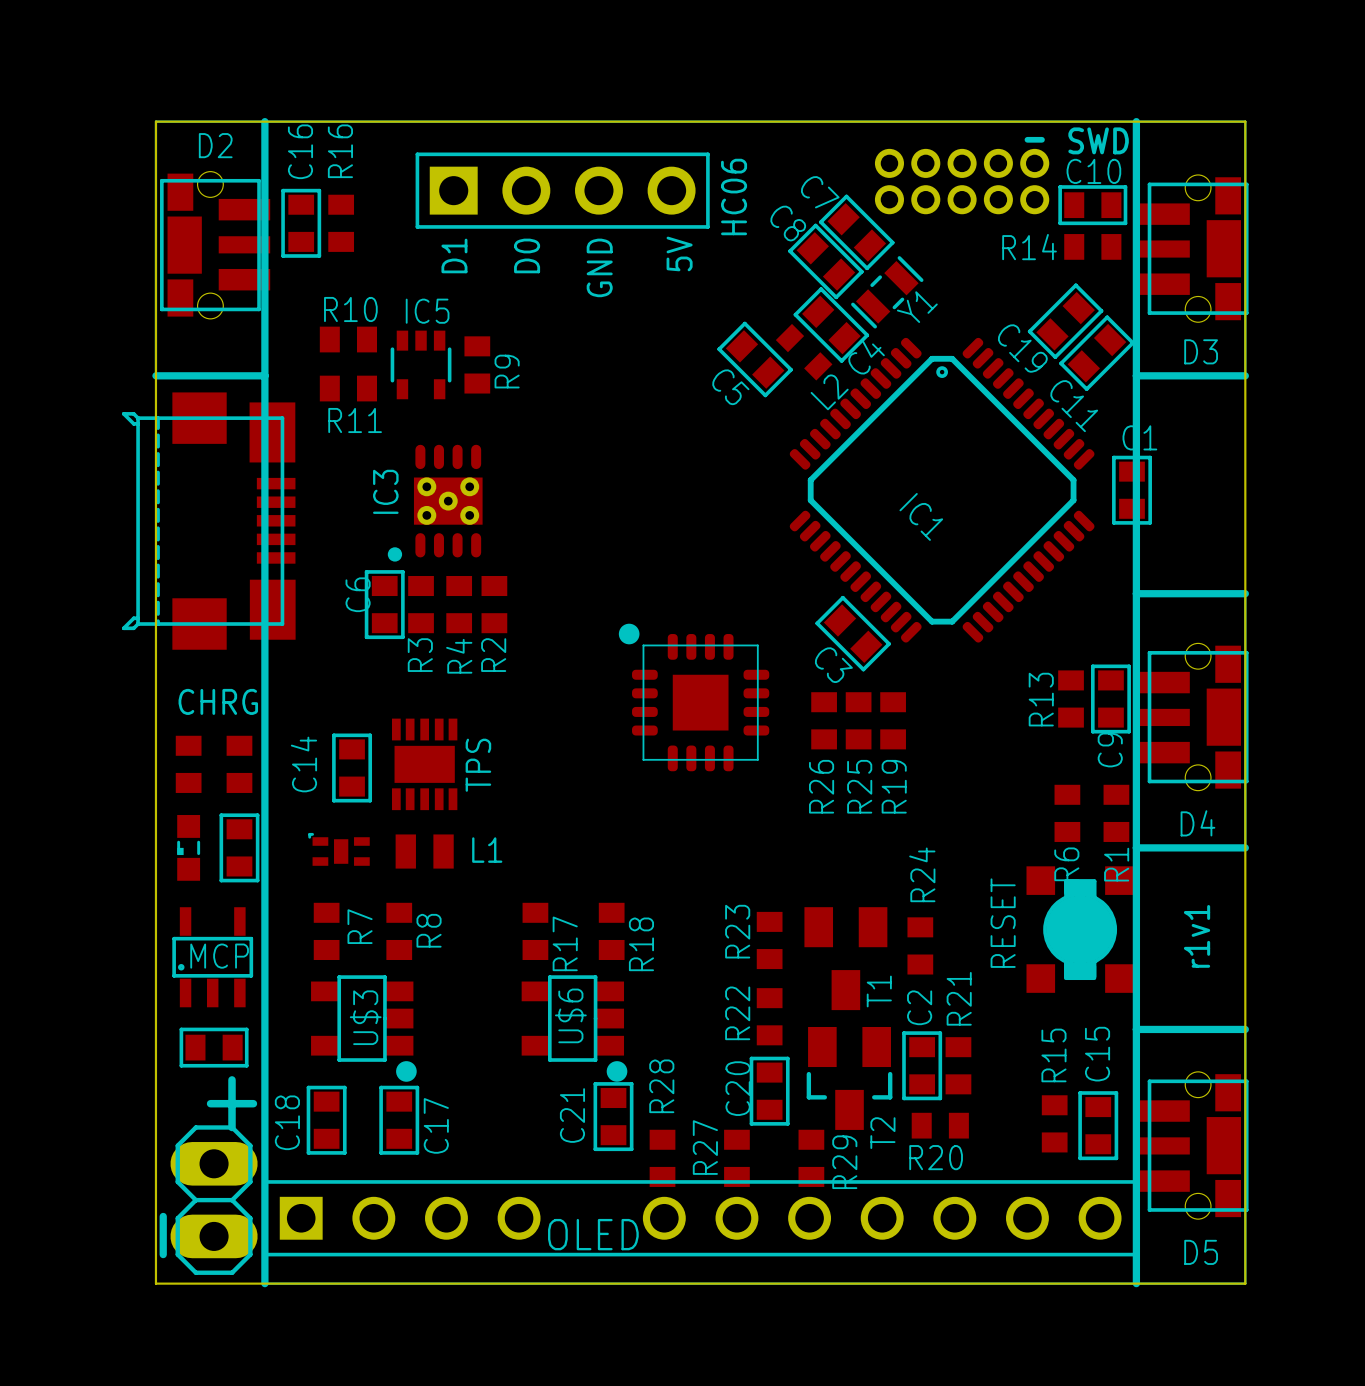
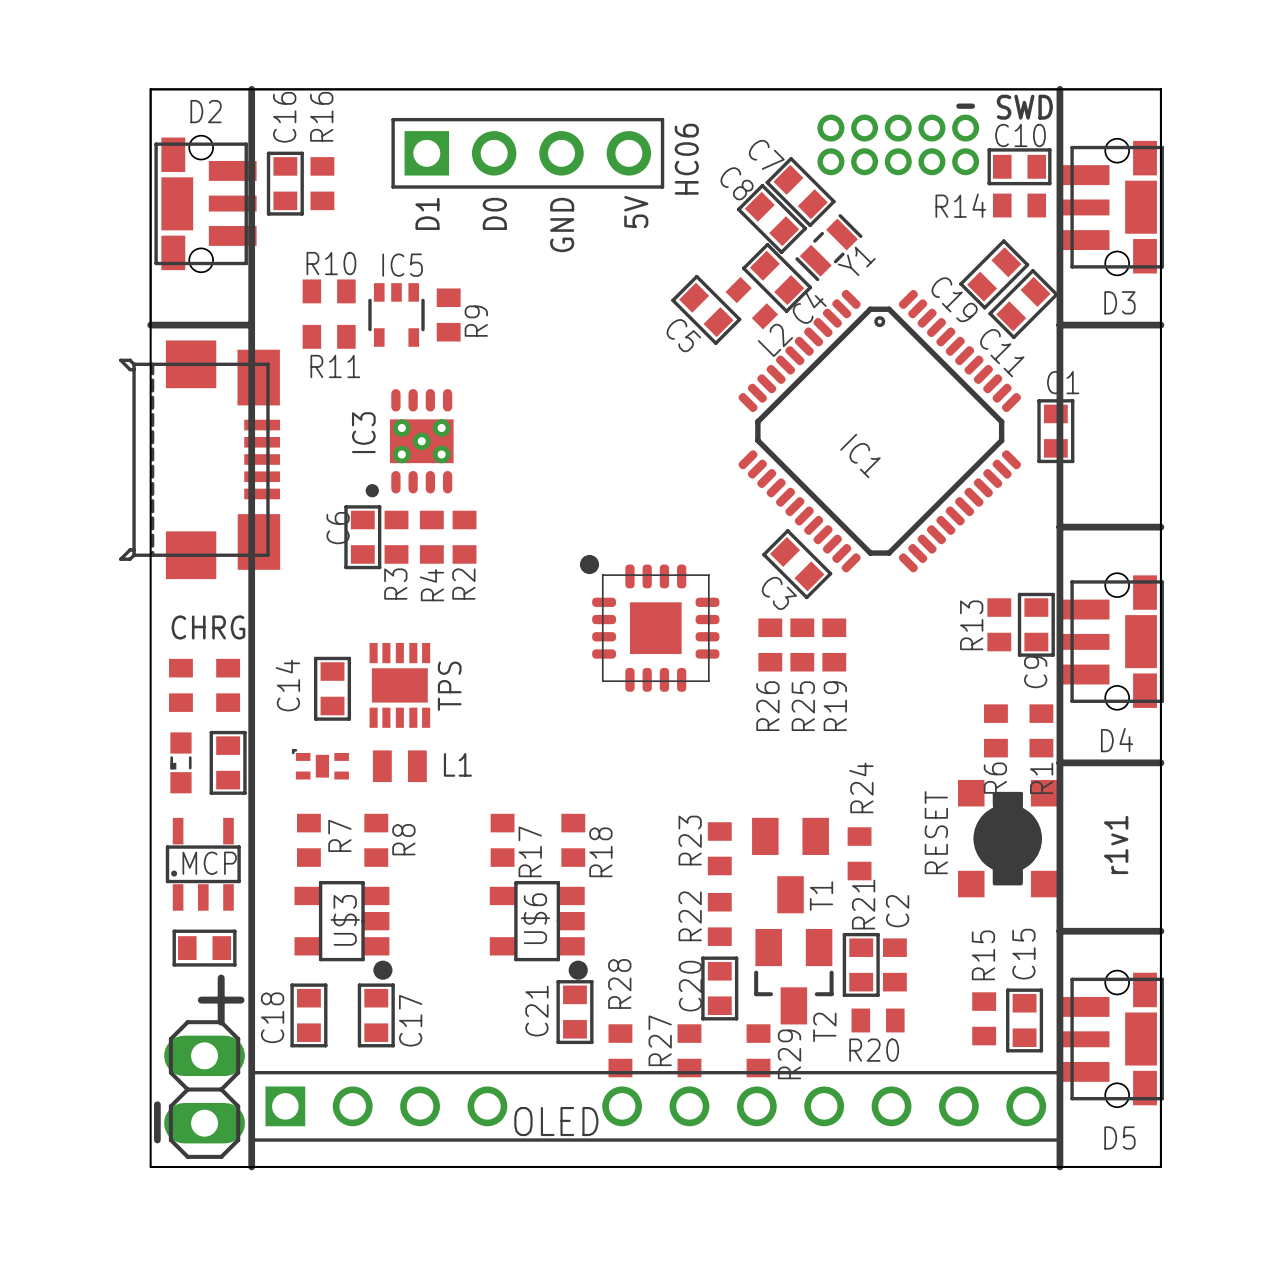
R21 name position: R21 (959, 998) -> R21 (863, 904)
C2 name position: C2 (919, 1007) -> C2 (897, 911)

